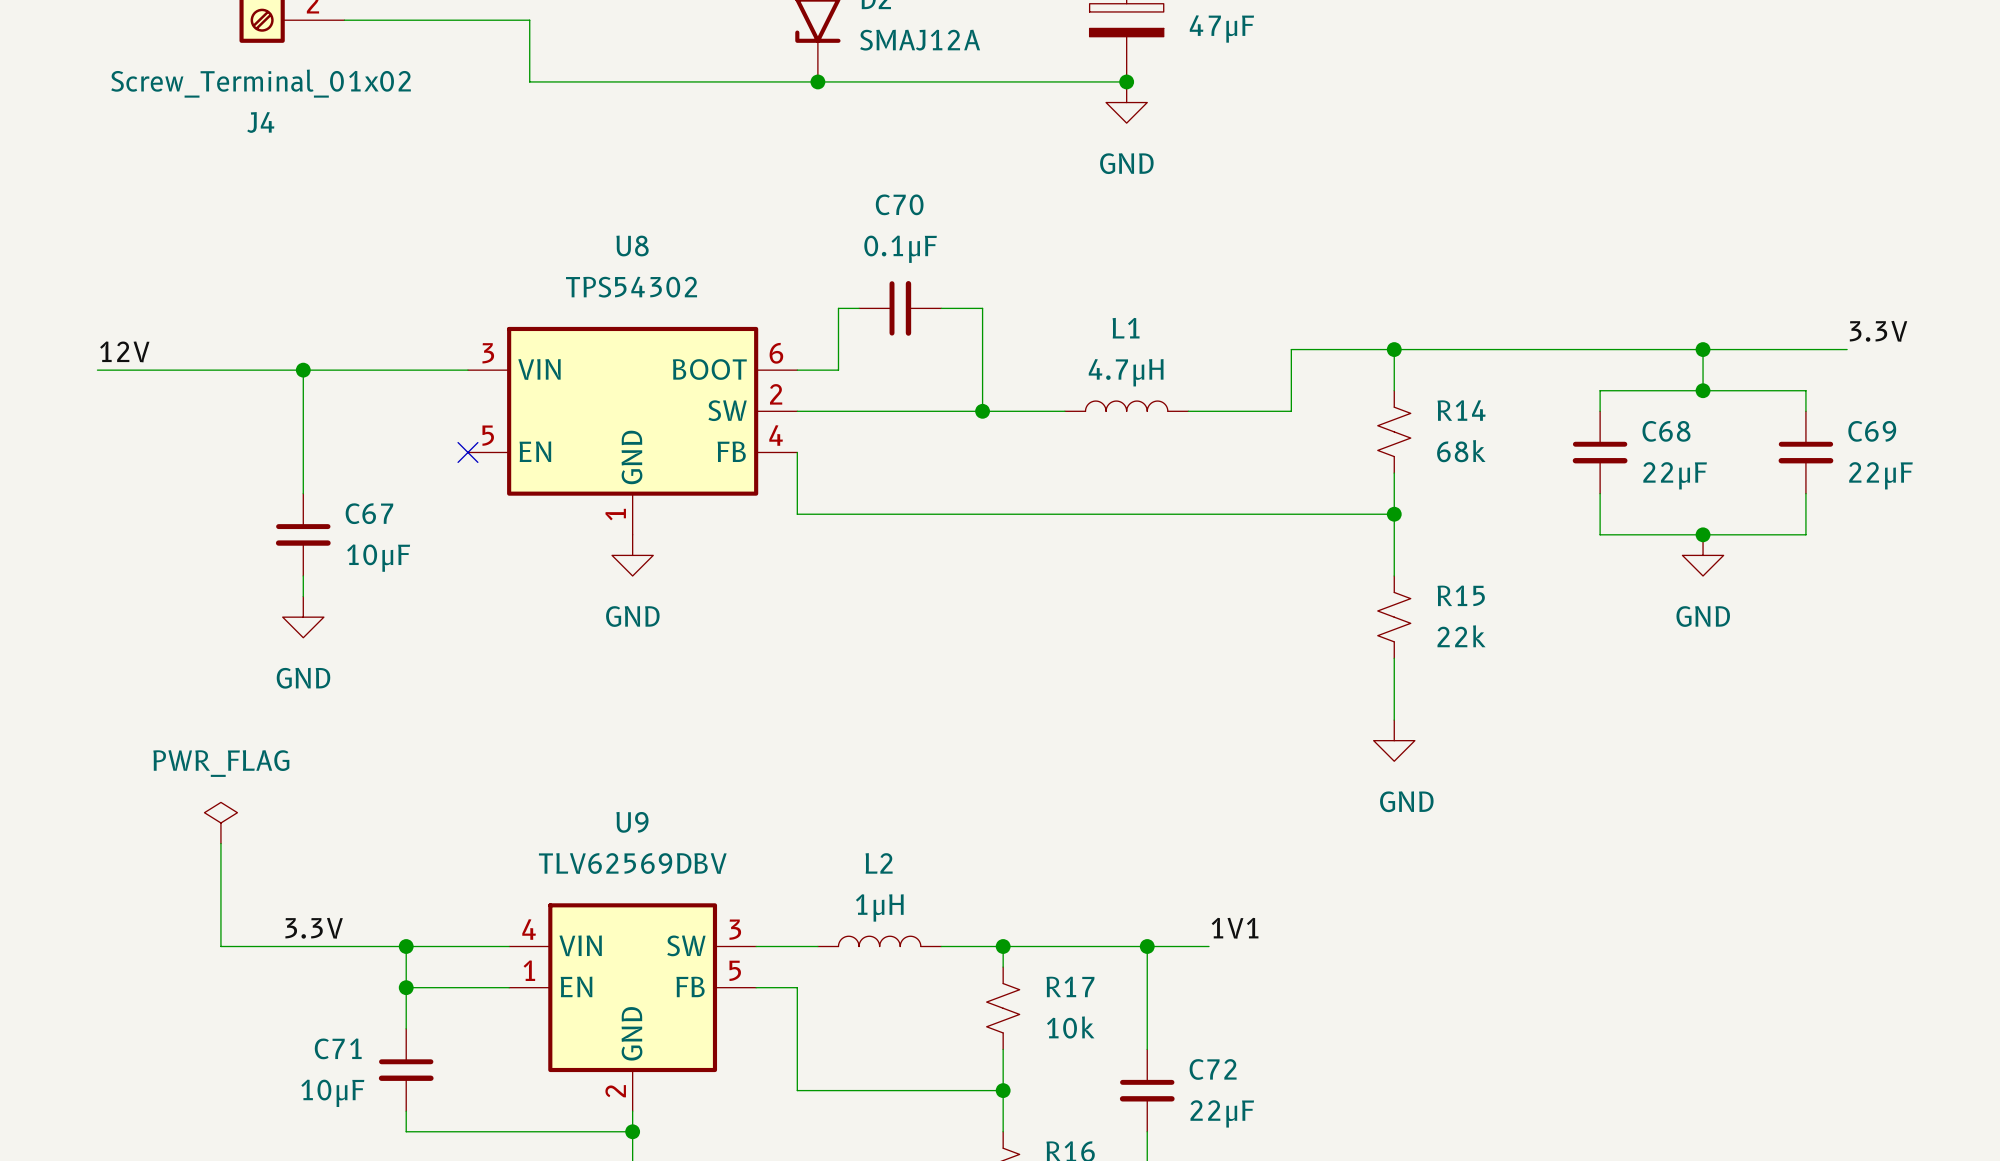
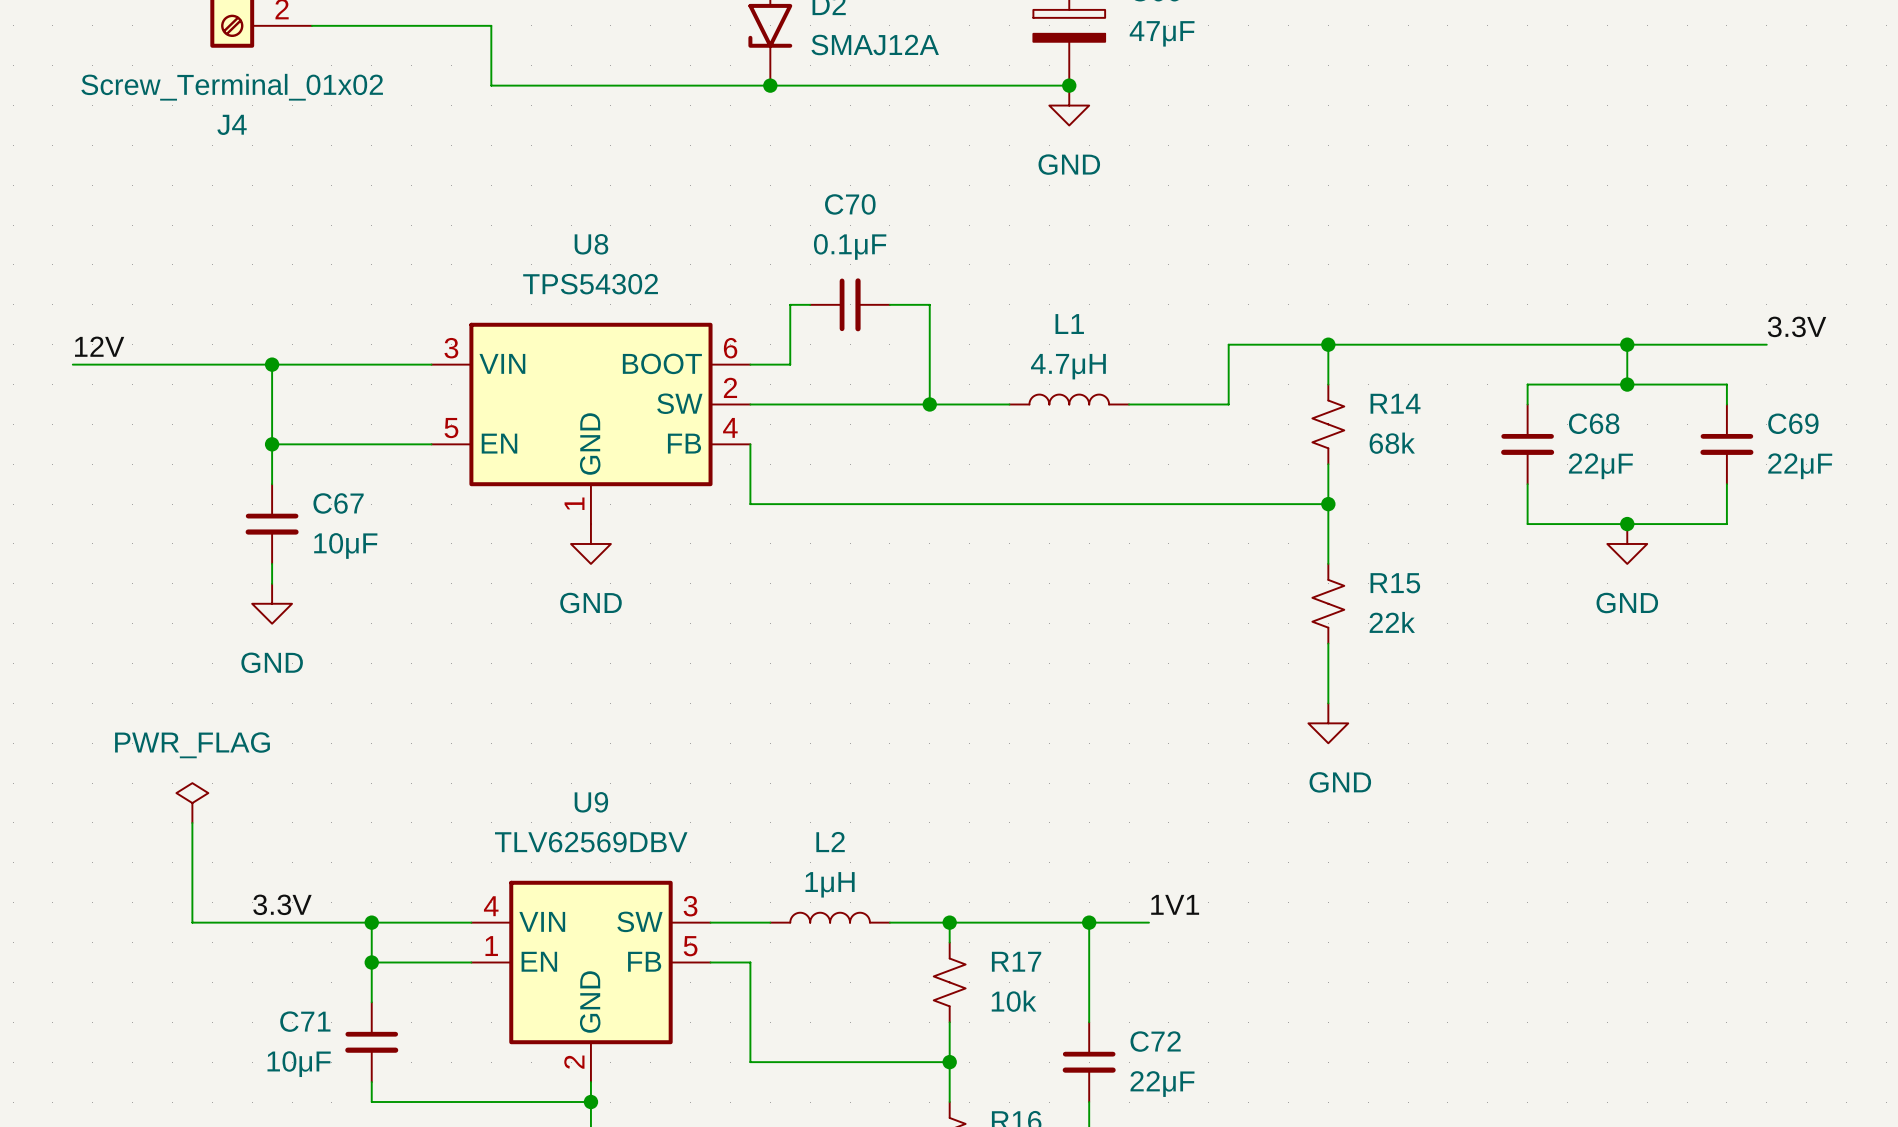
wire: none -> (272, 444) (431, 444)
junction: none -> (272, 444)
no-connect mark: (467, 452) -> none

